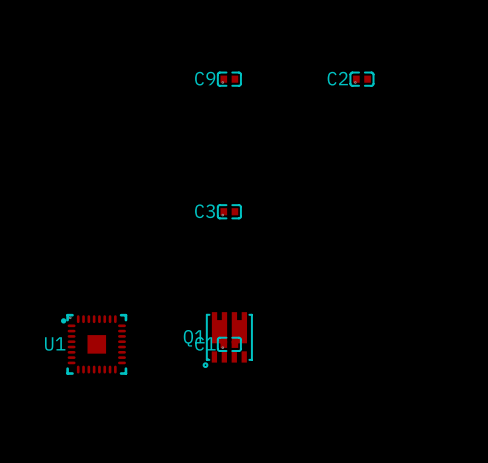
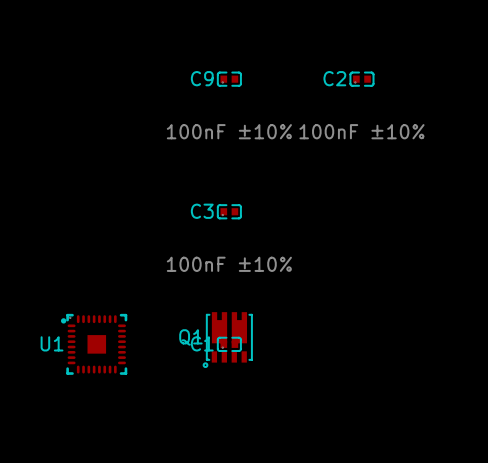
C9 value: none -> 100nF ±10% (229, 131)
C2 value: none -> 100nF ±10% (361, 131)
C3 value: none -> 100nF ±10% (229, 264)

